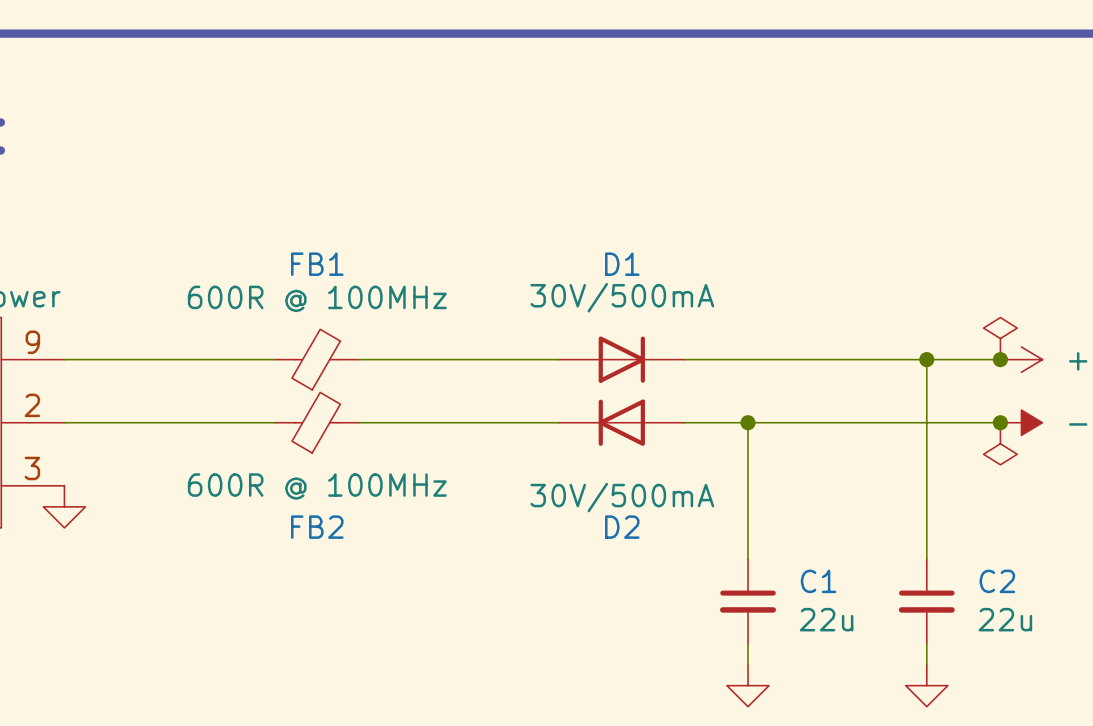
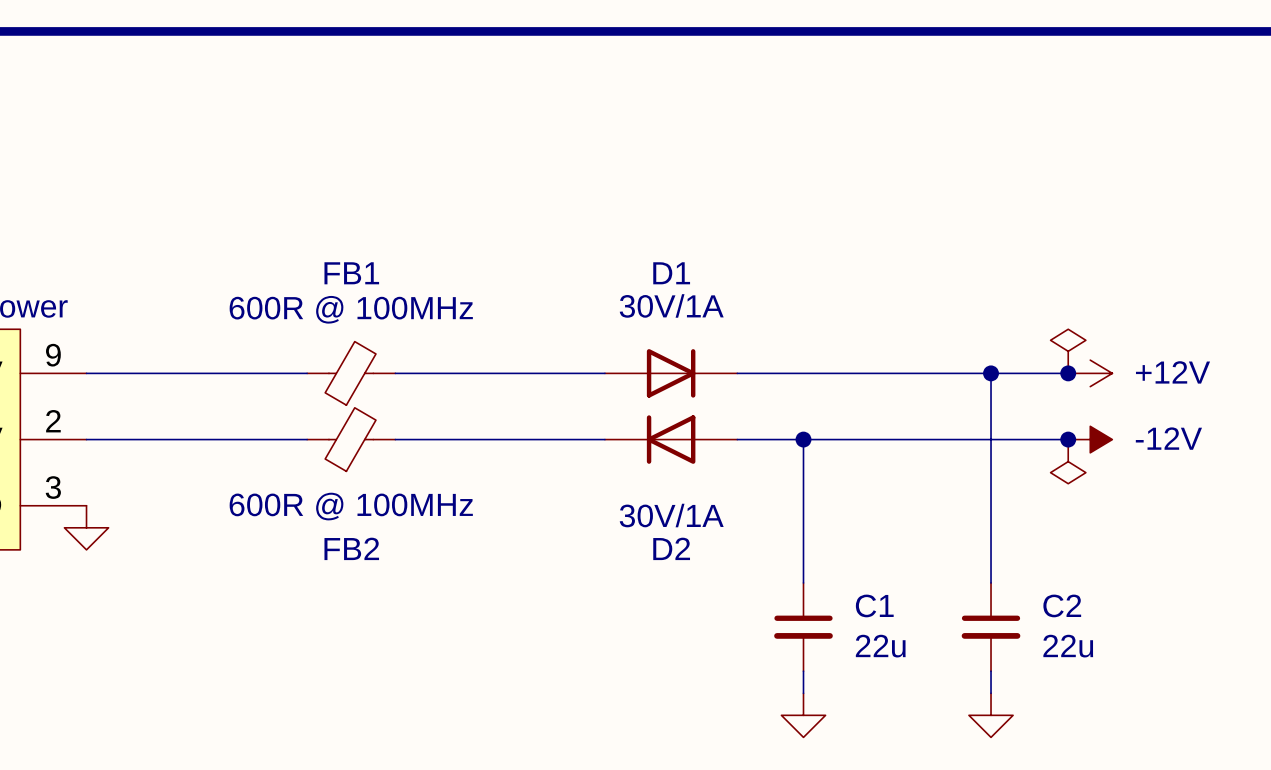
D1 value: 30V/500mA (622, 297) -> 30V/1A (671, 305)
D2 value: 30V/500mA (622, 497) -> 30V/1A (671, 515)

